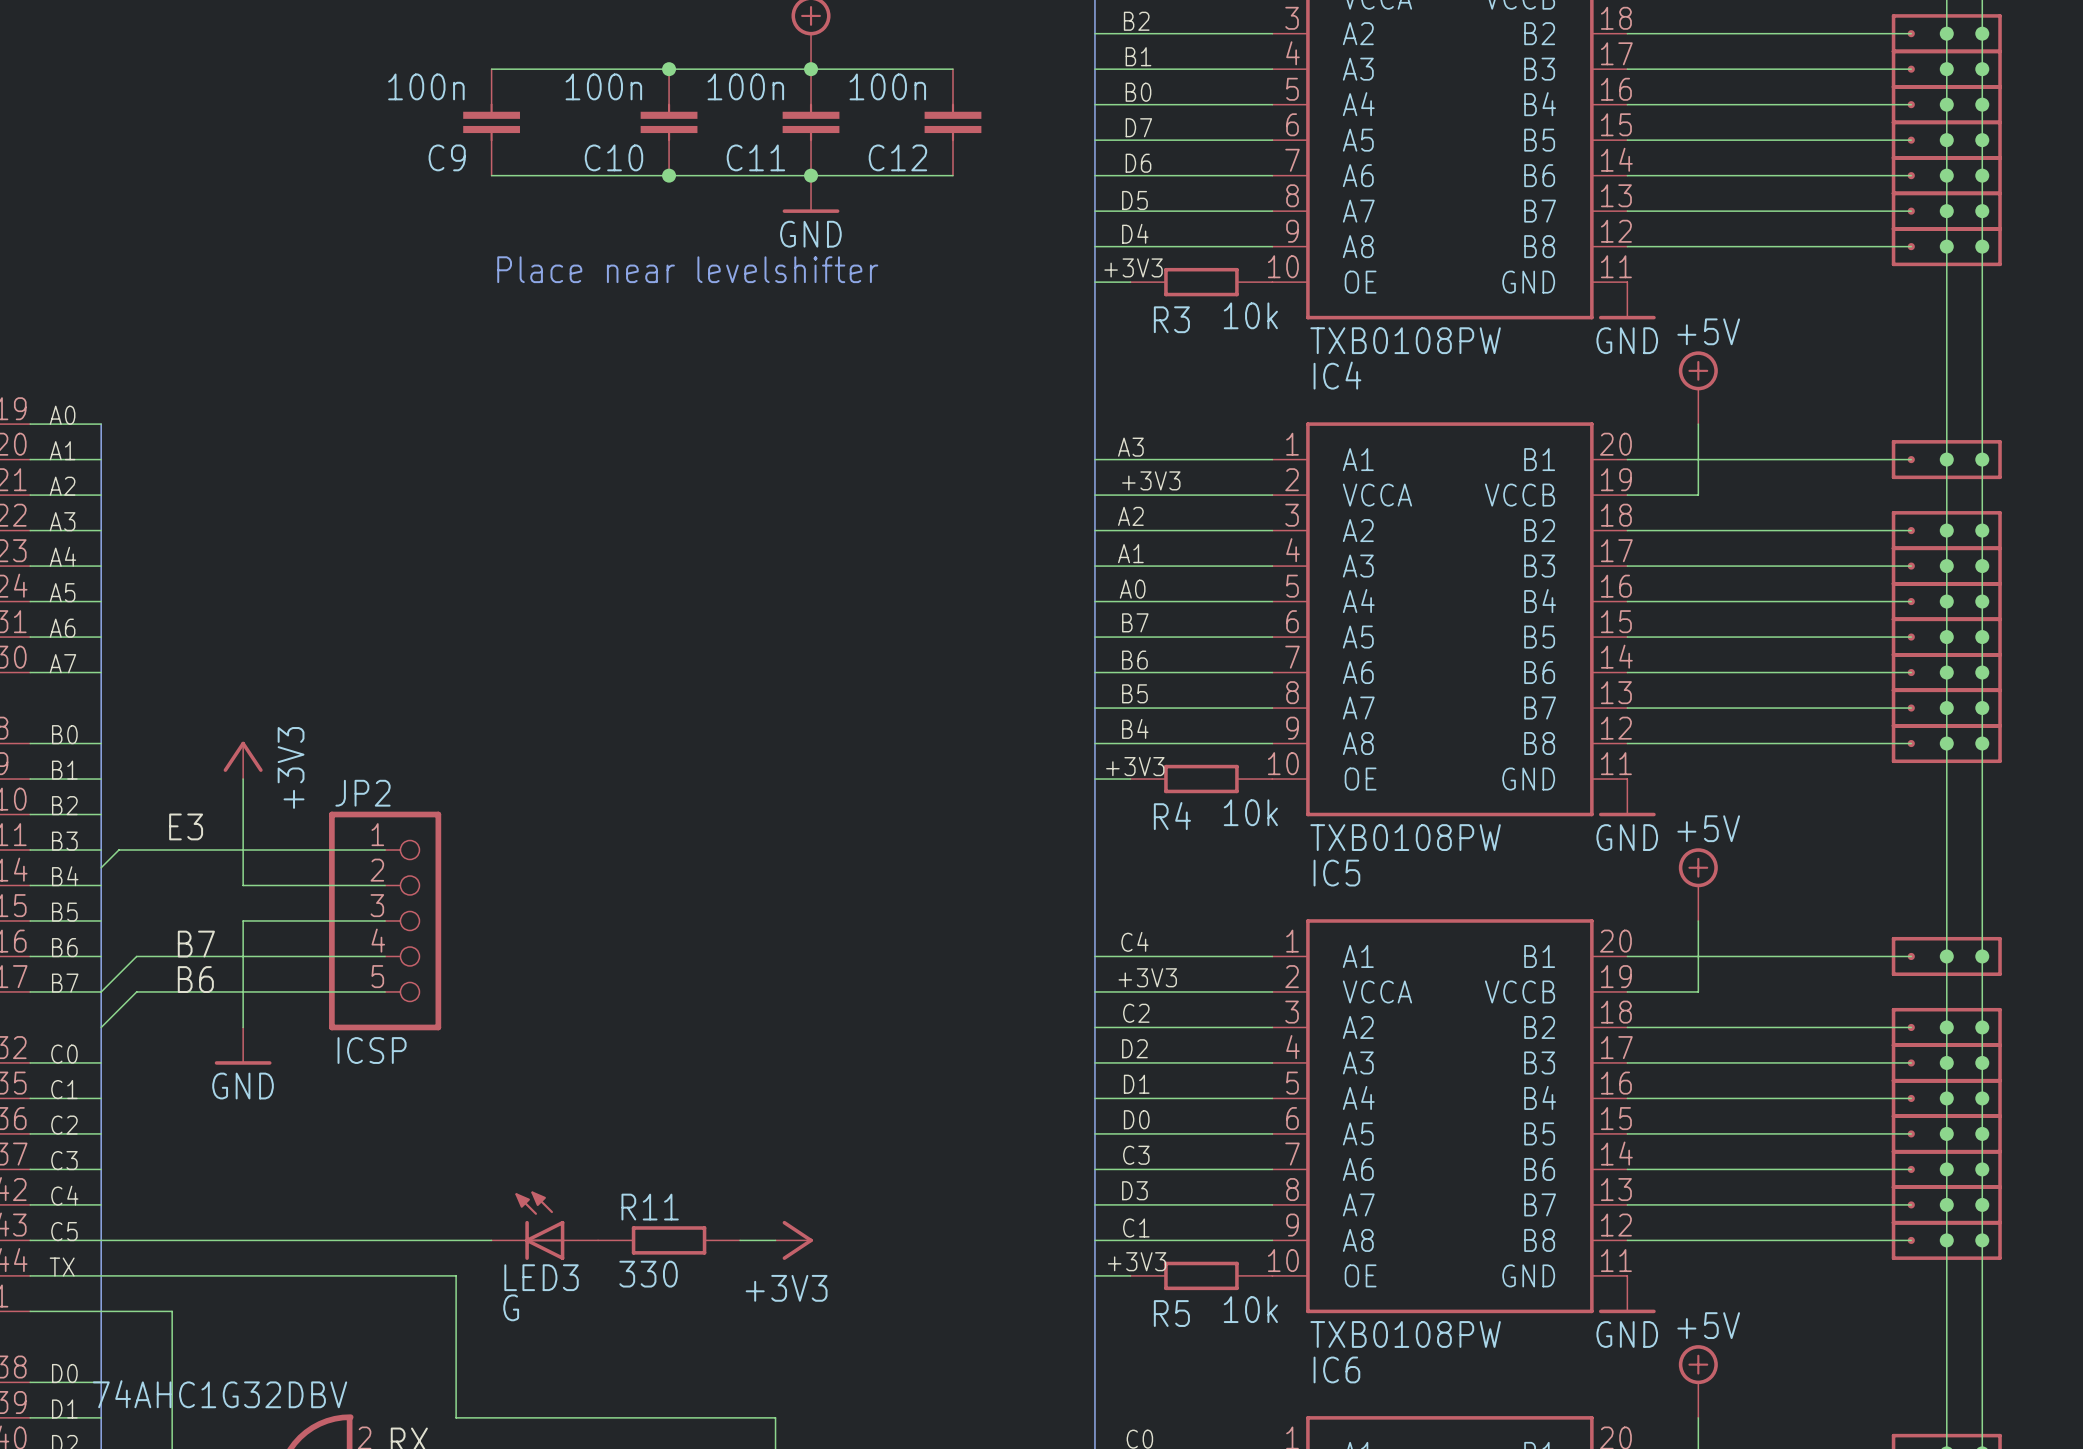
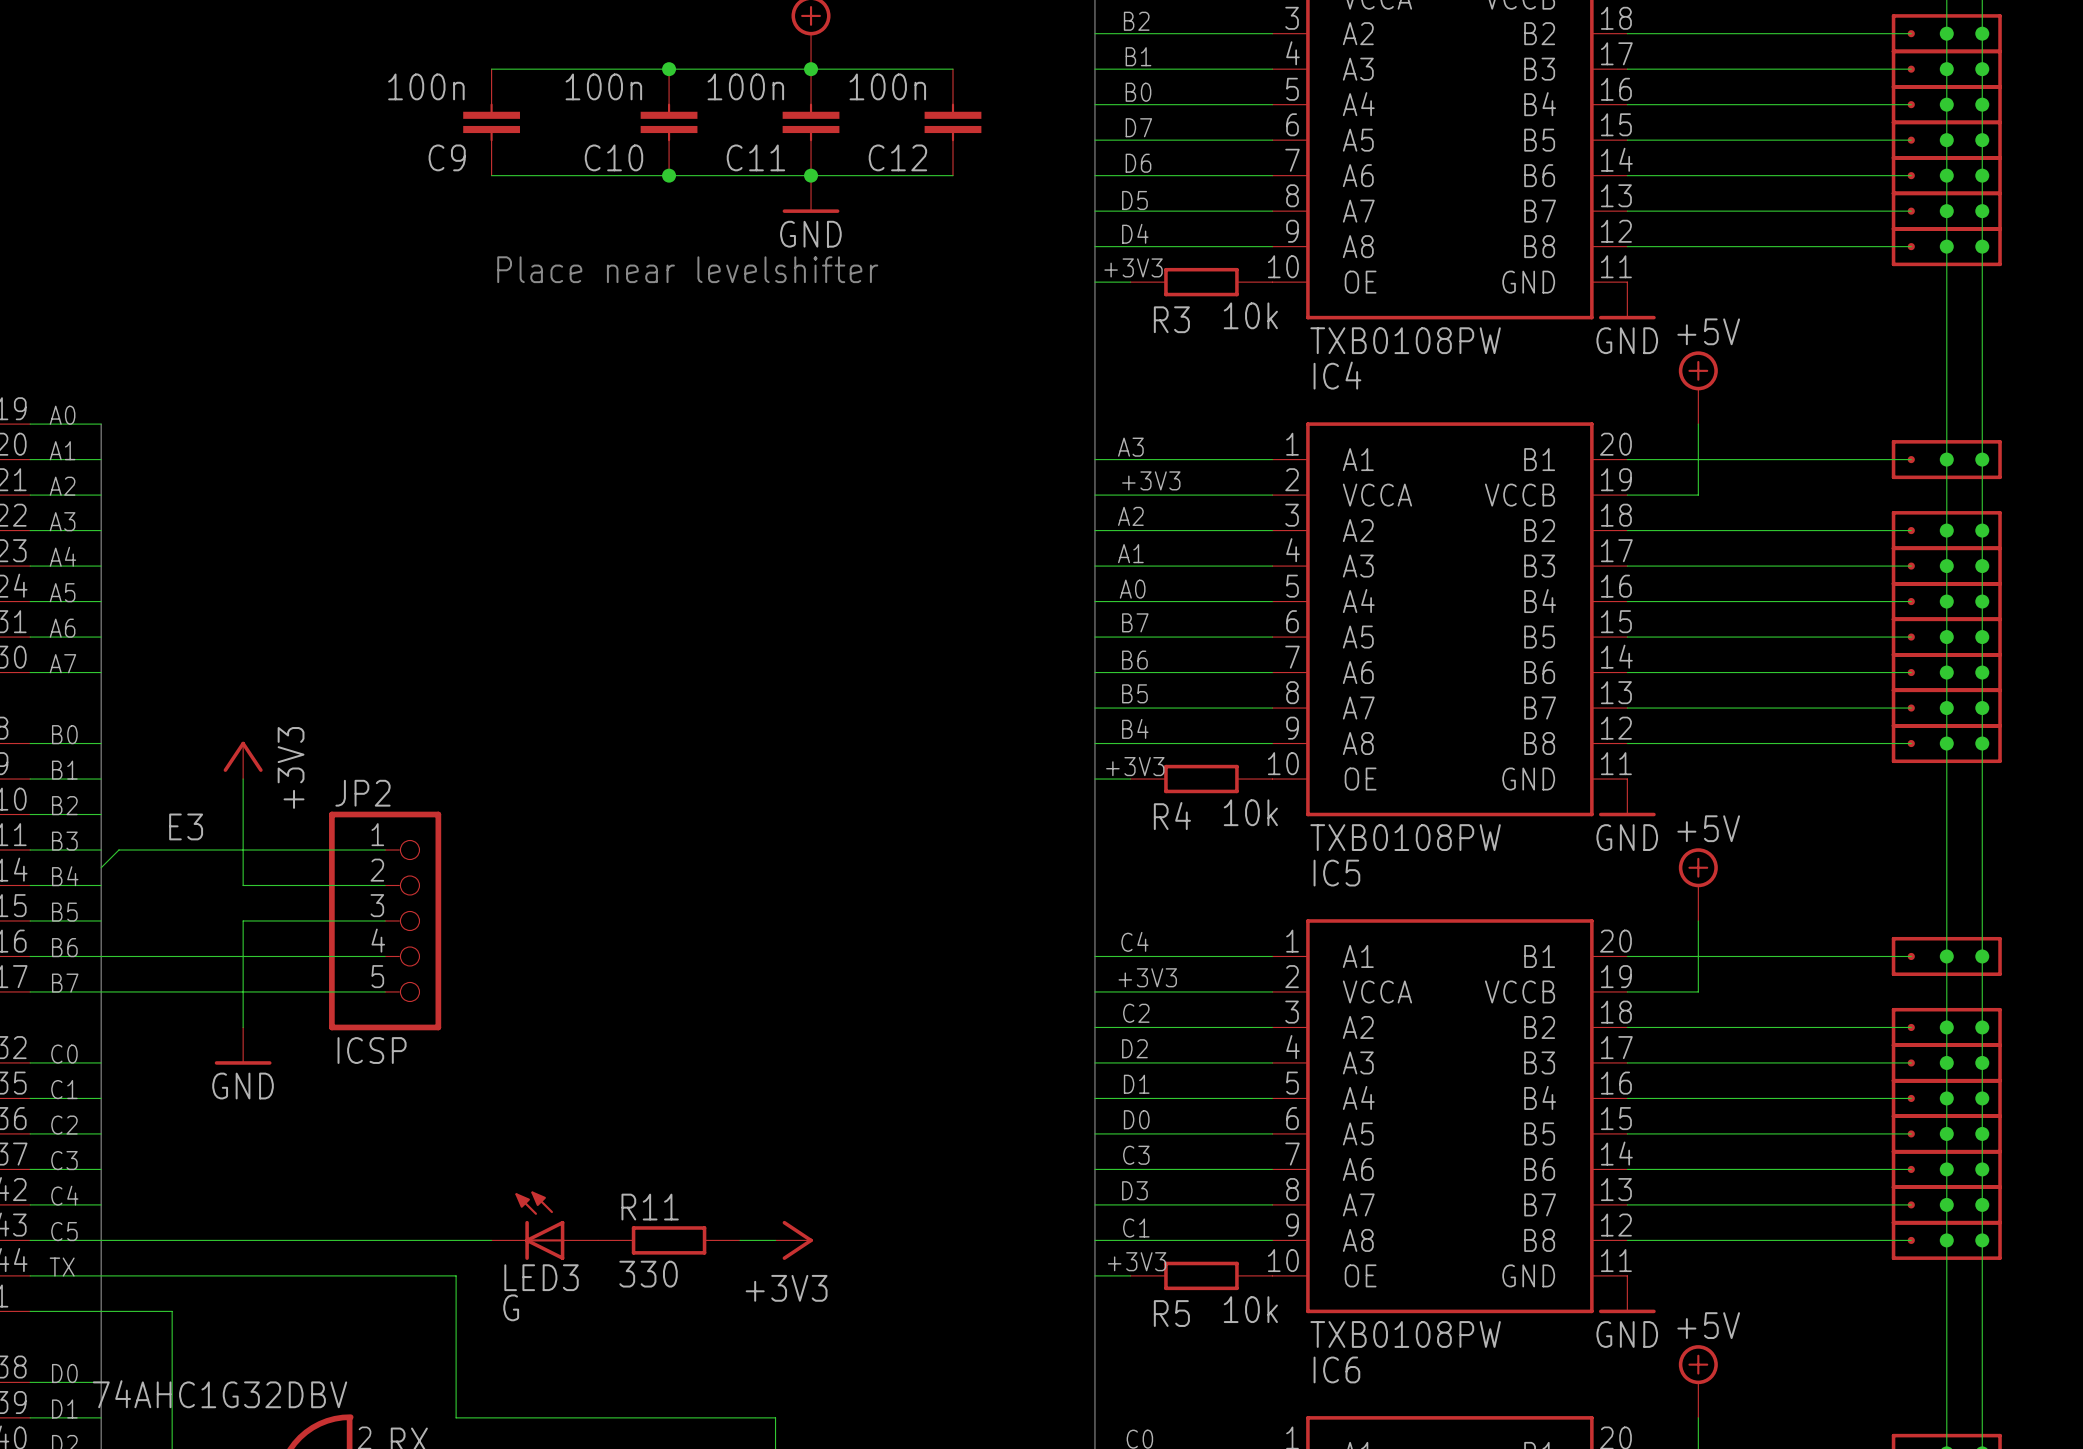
label: B7 (196, 944) -> none
wire: (136, 956) (101, 991) -> (136, 956) (101, 956)
label: B6 (195, 979) -> none
wire: (136, 991) (101, 1027) -> (136, 991) (101, 991)

